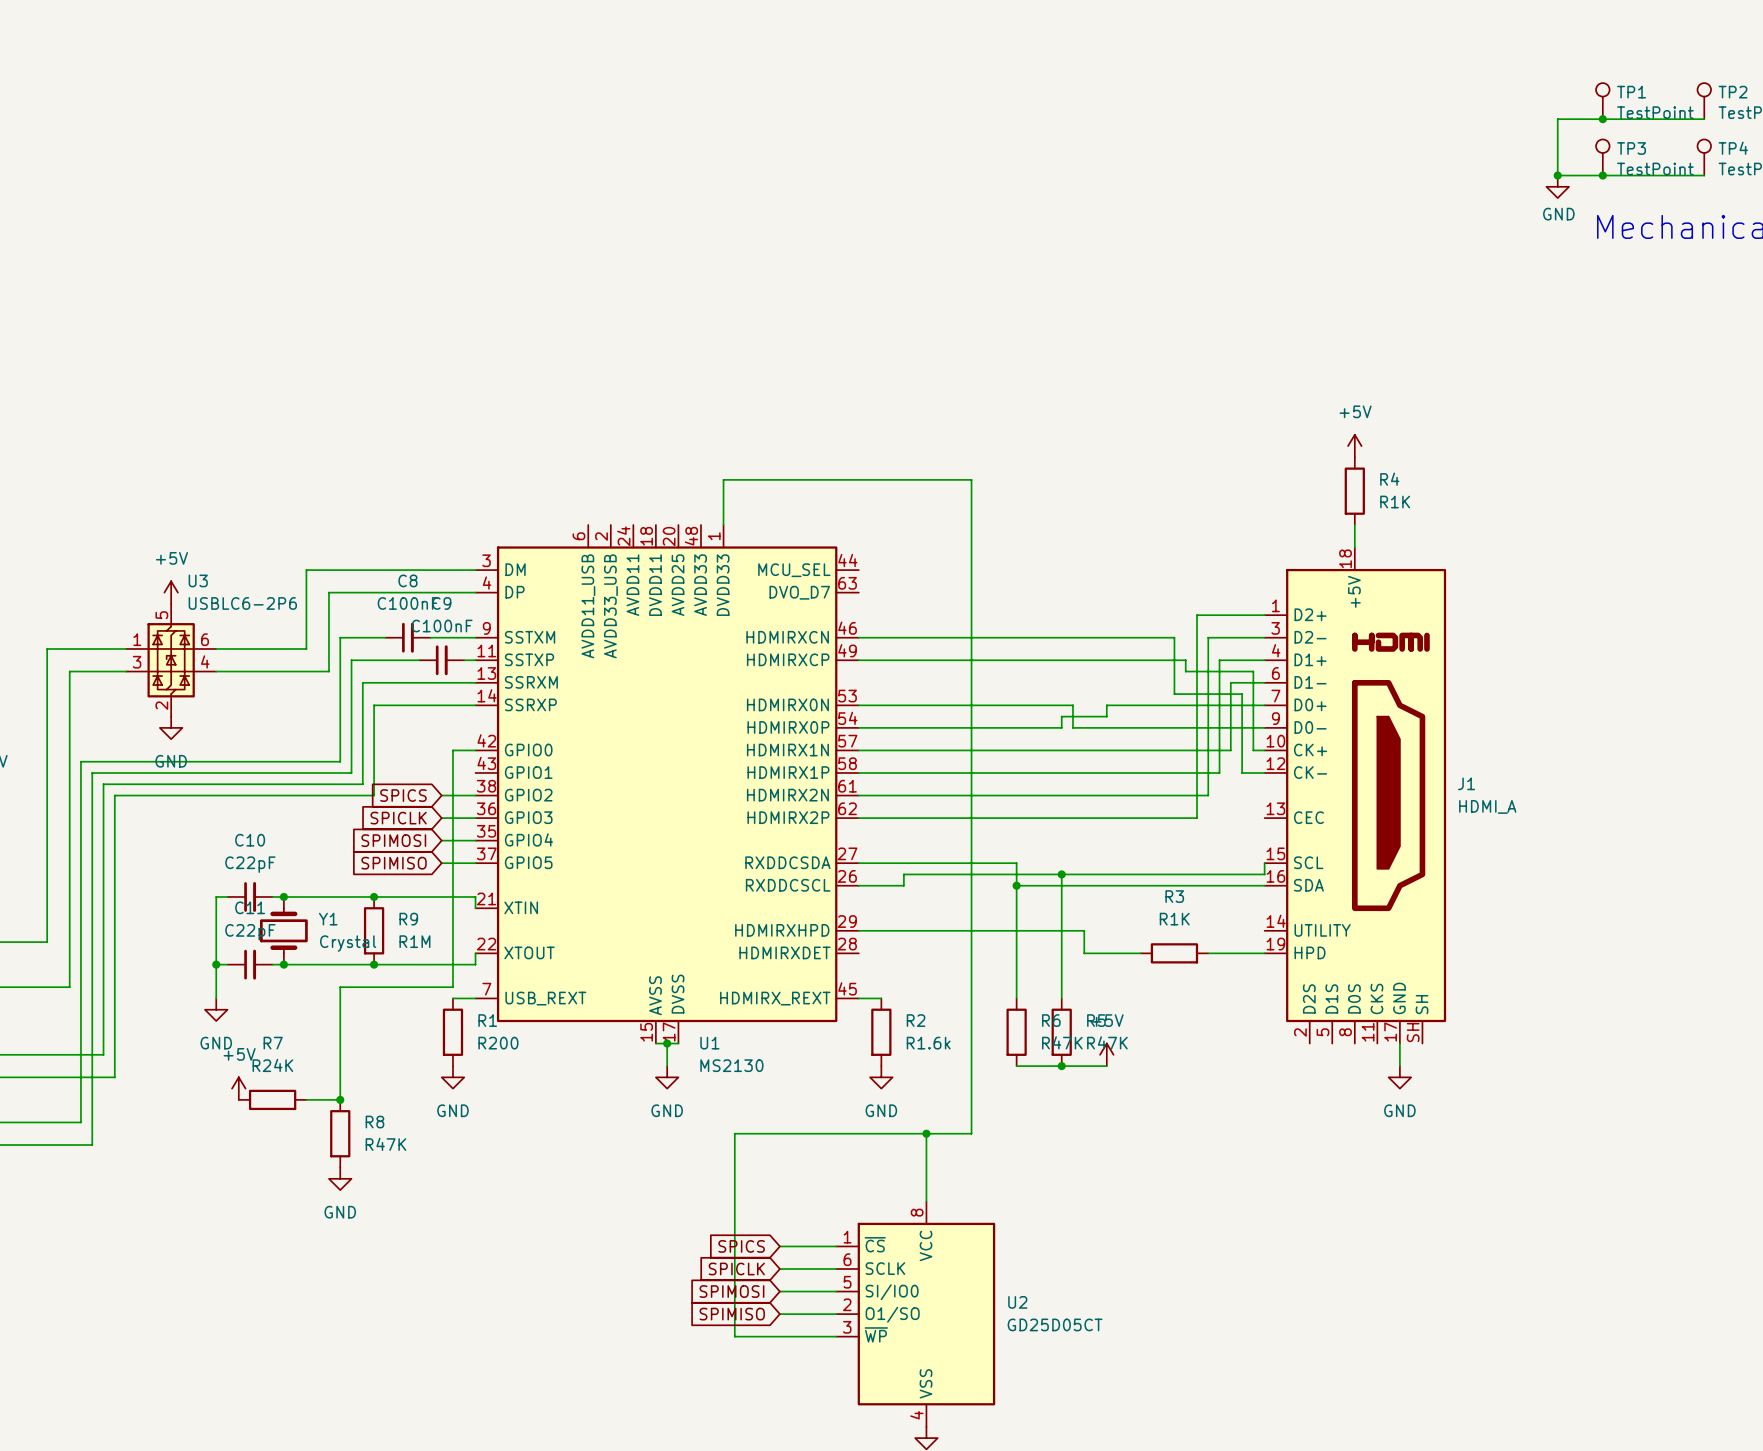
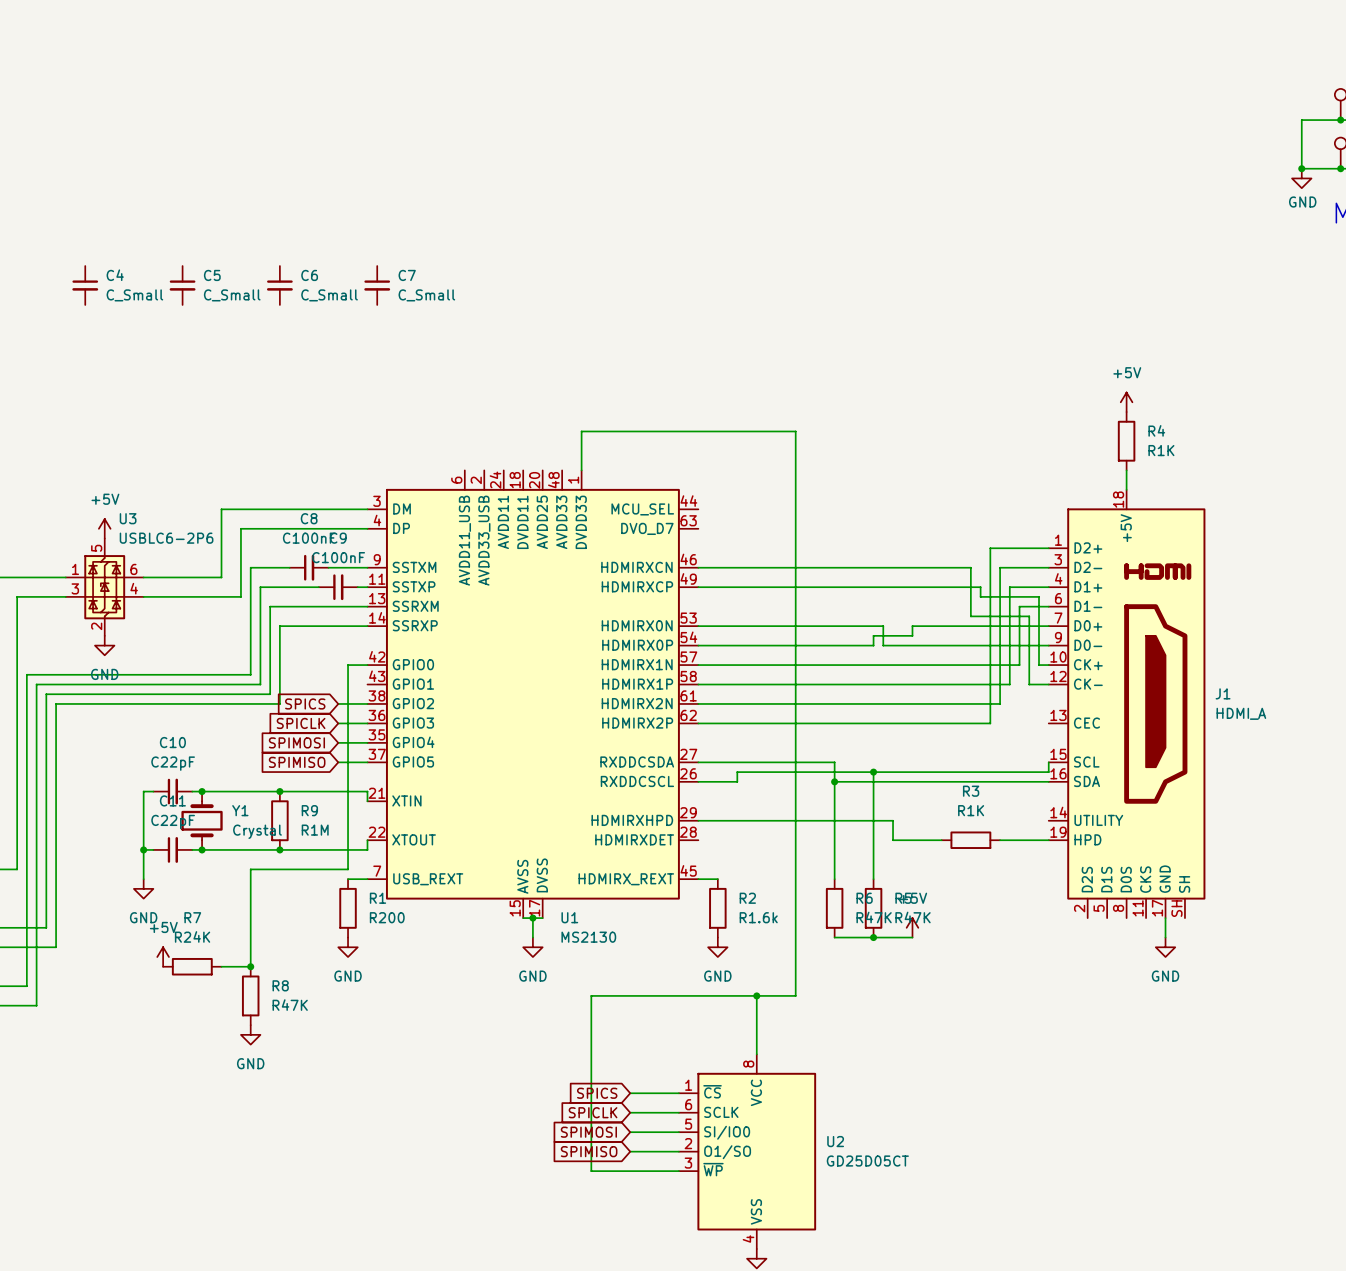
C4: none -> C_Small (85, 285)
C5: none -> C_Small (182, 285)
C6: none -> C_Small (279, 285)
C7: none -> C_Small (377, 285)

